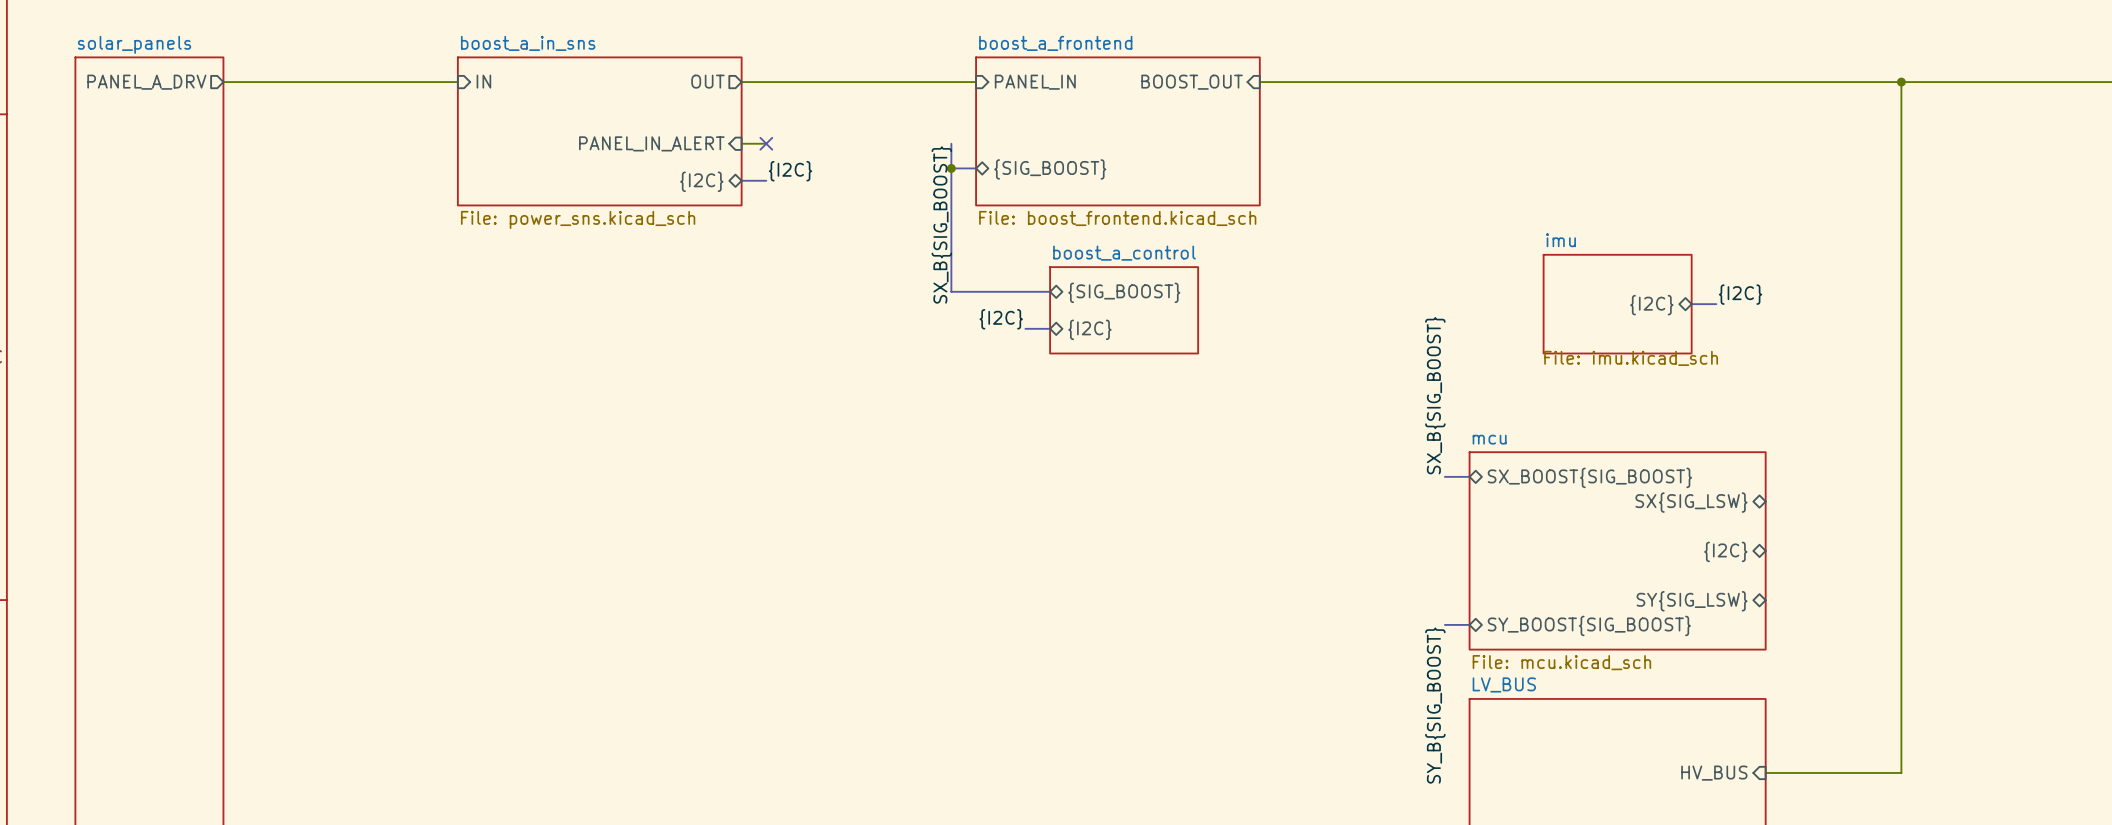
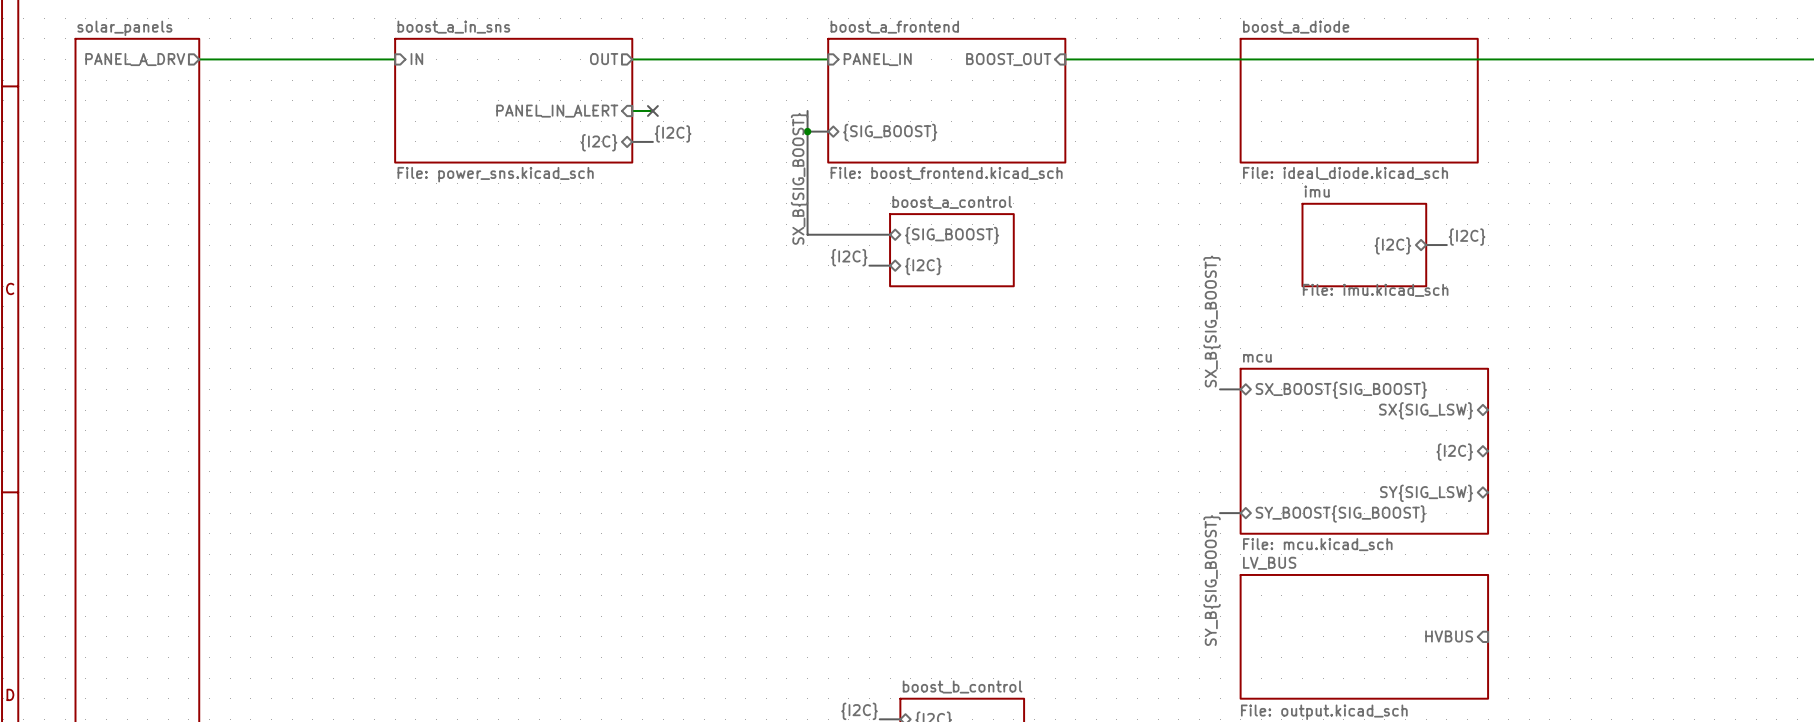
wire: (1901, 82) (1901, 772) (1765, 772) -> none
junction: (1901, 82) -> none
sheet boost_a_diode: none -> File: ideal_diode.kicad_sch (1359, 100)
sheet pin: HV_BUS (1714, 773) -> HVBUS (1449, 636)

